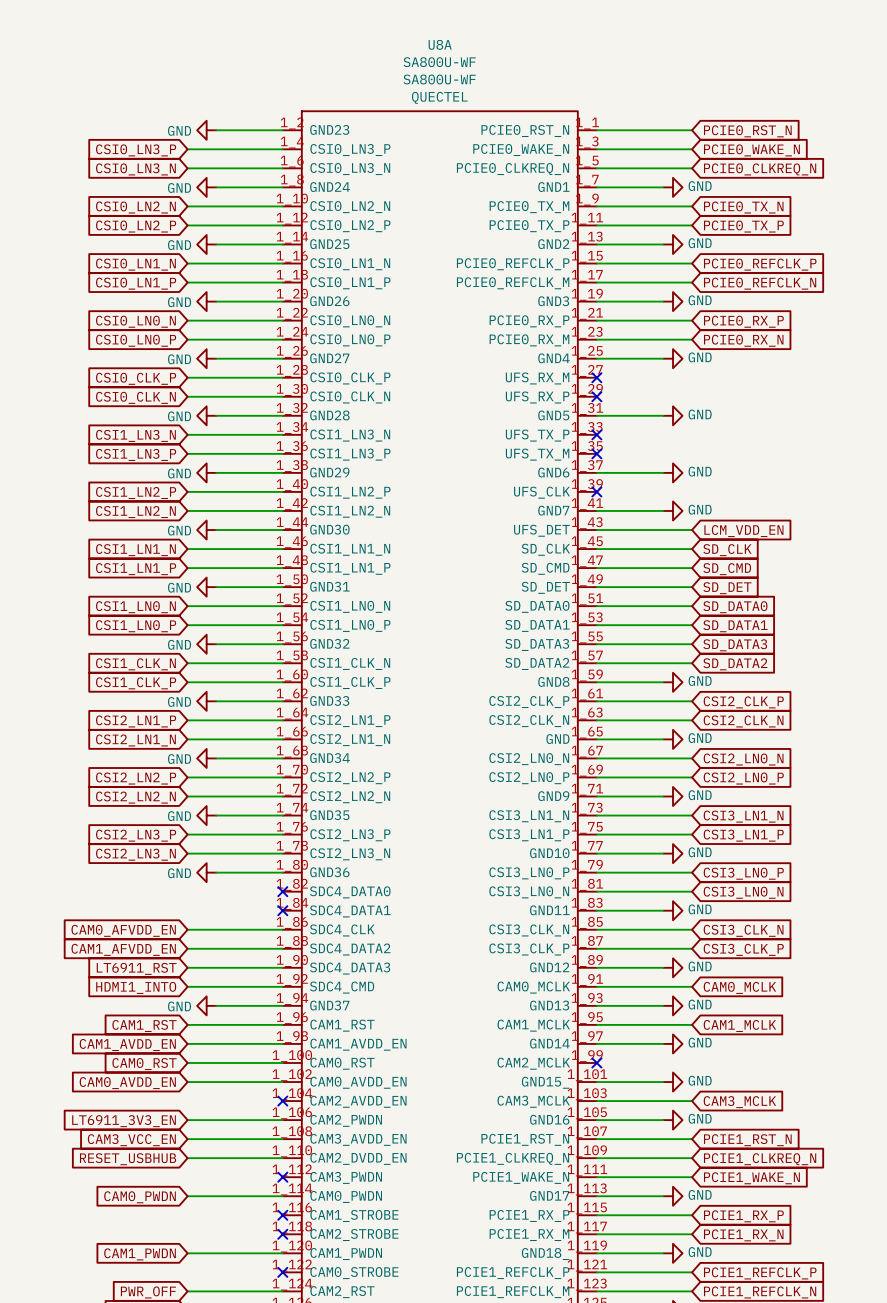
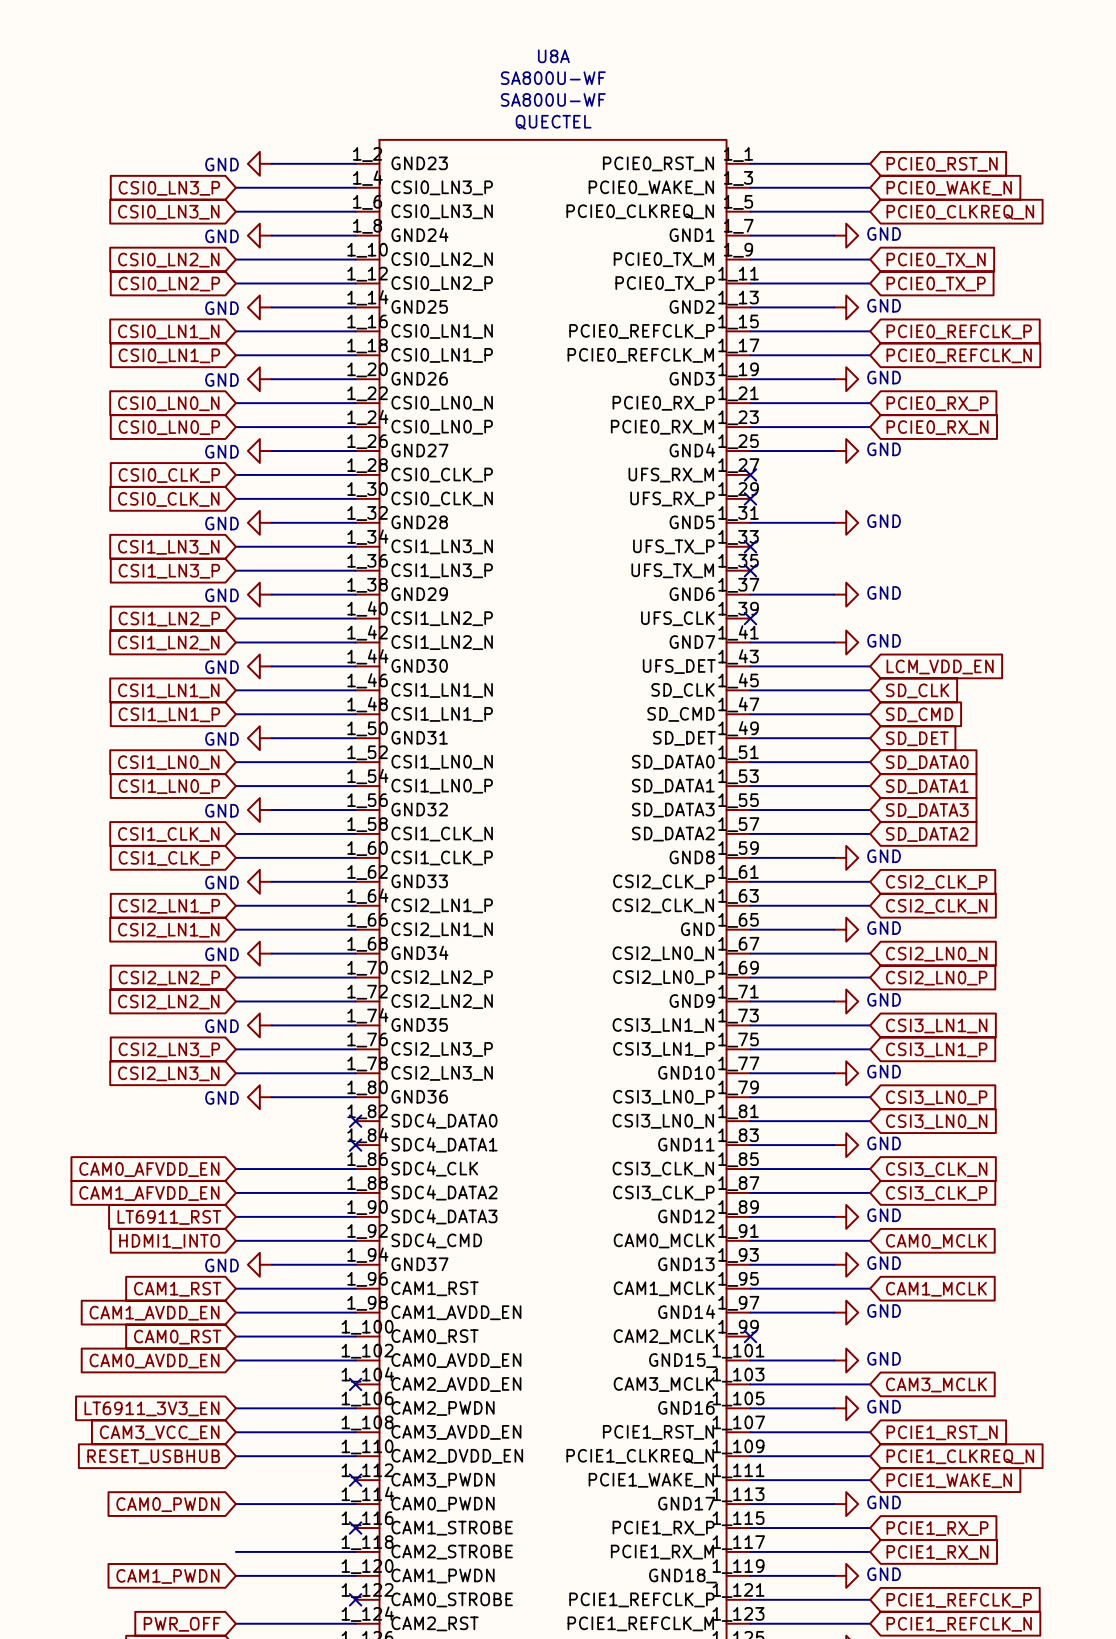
wire: none -> (235, 1551) (355, 1551)
no-connect mark: (282, 1234) -> none

